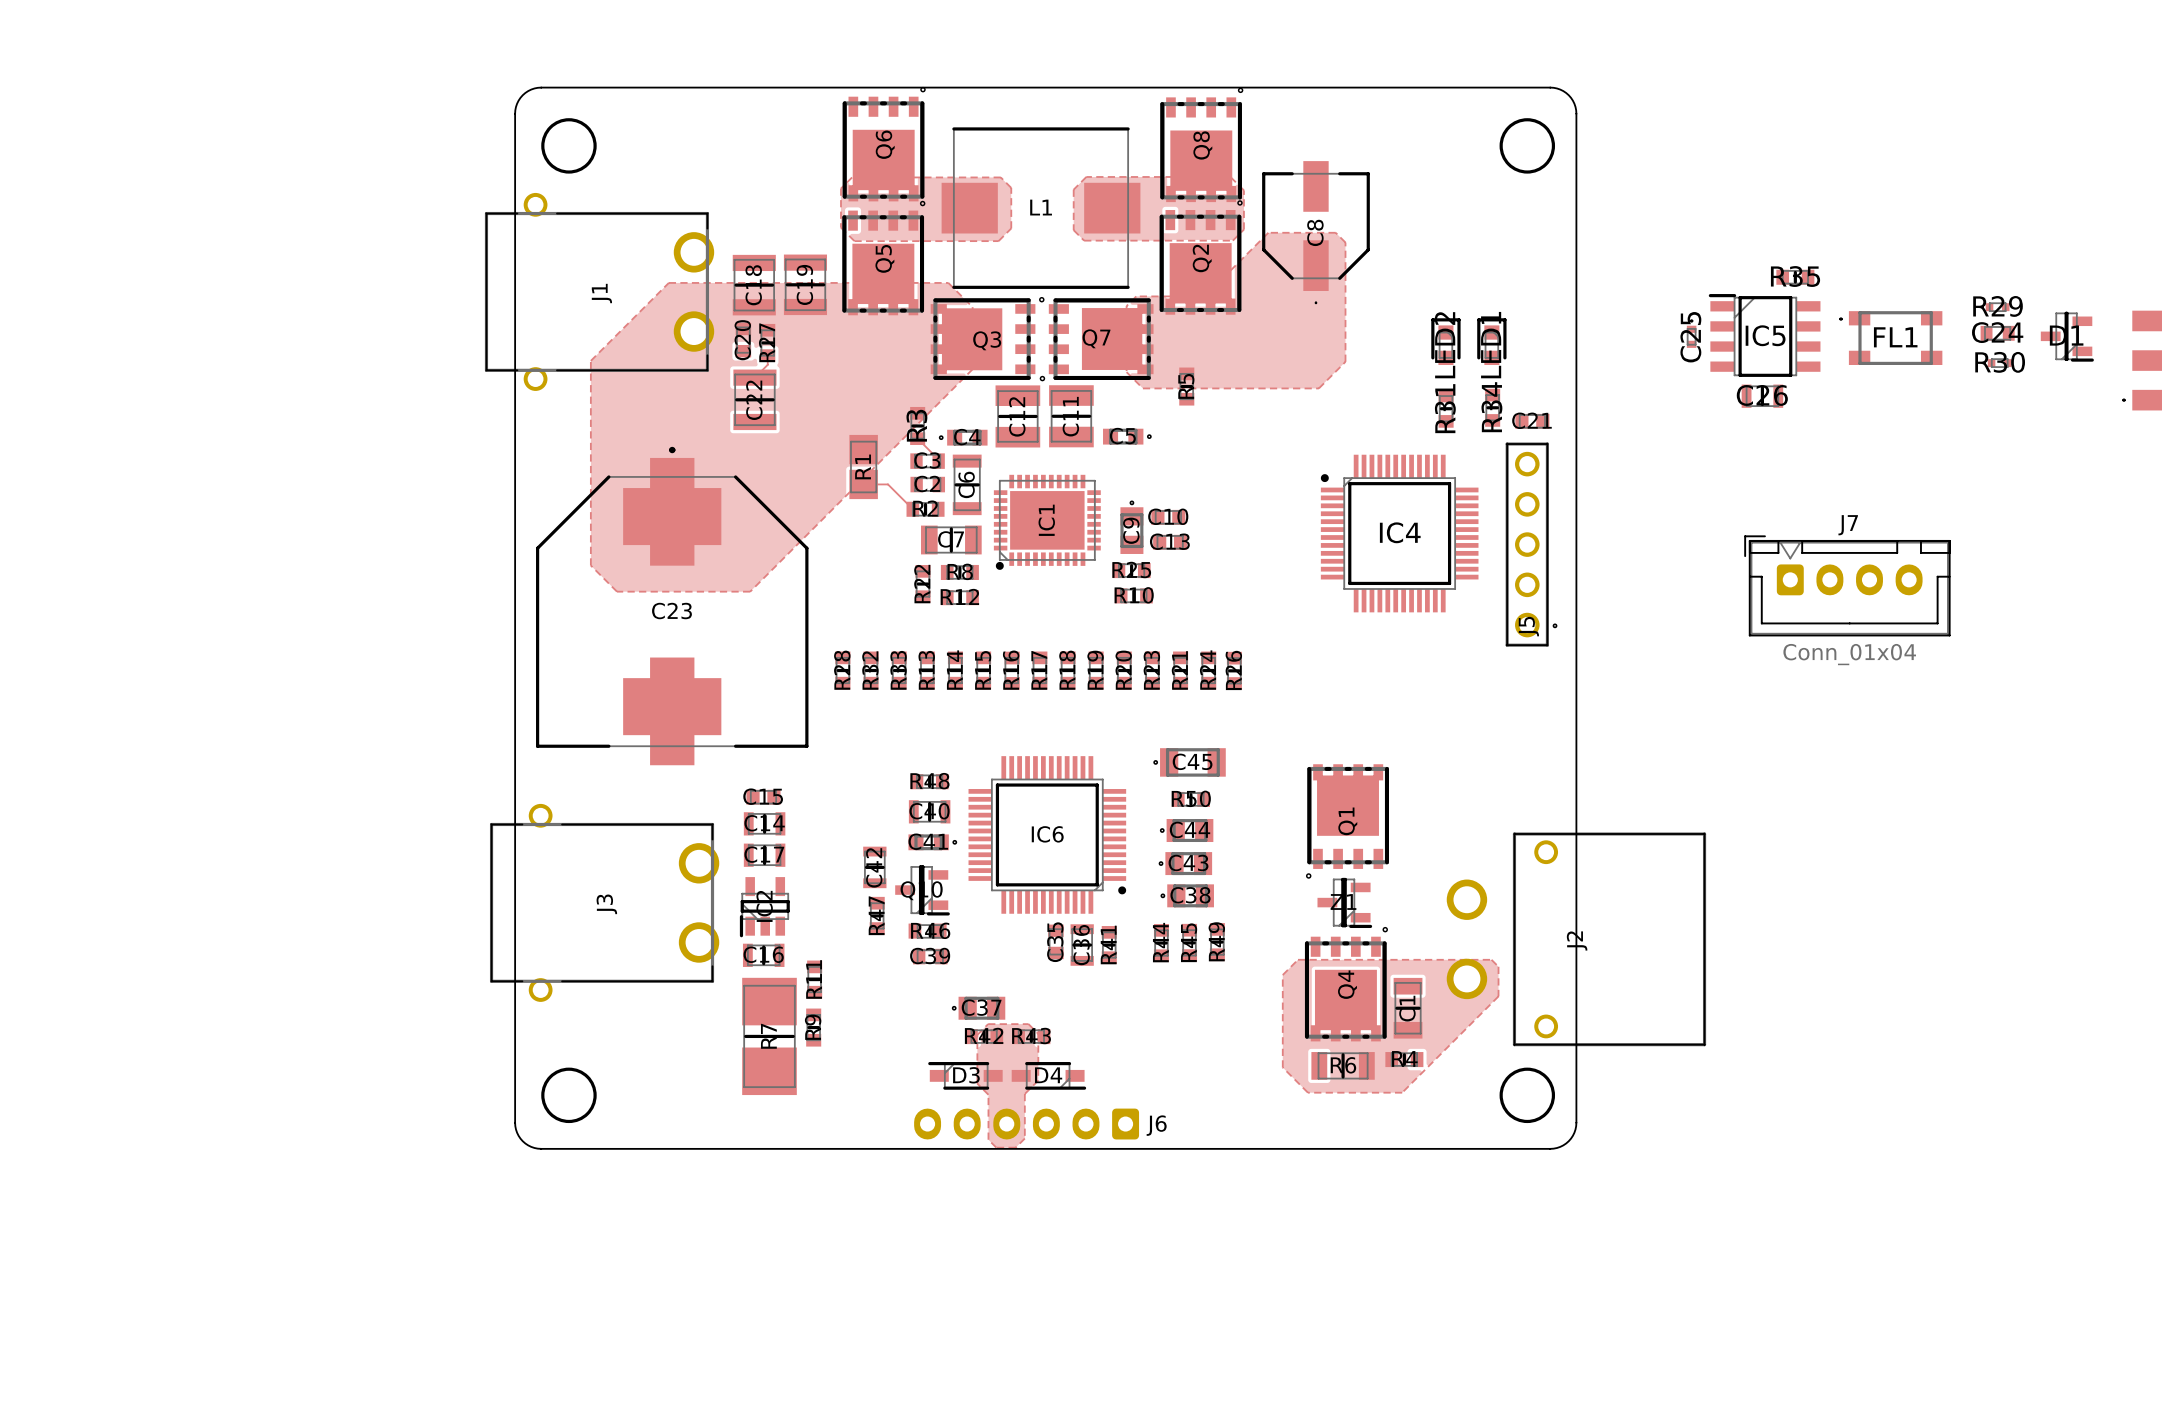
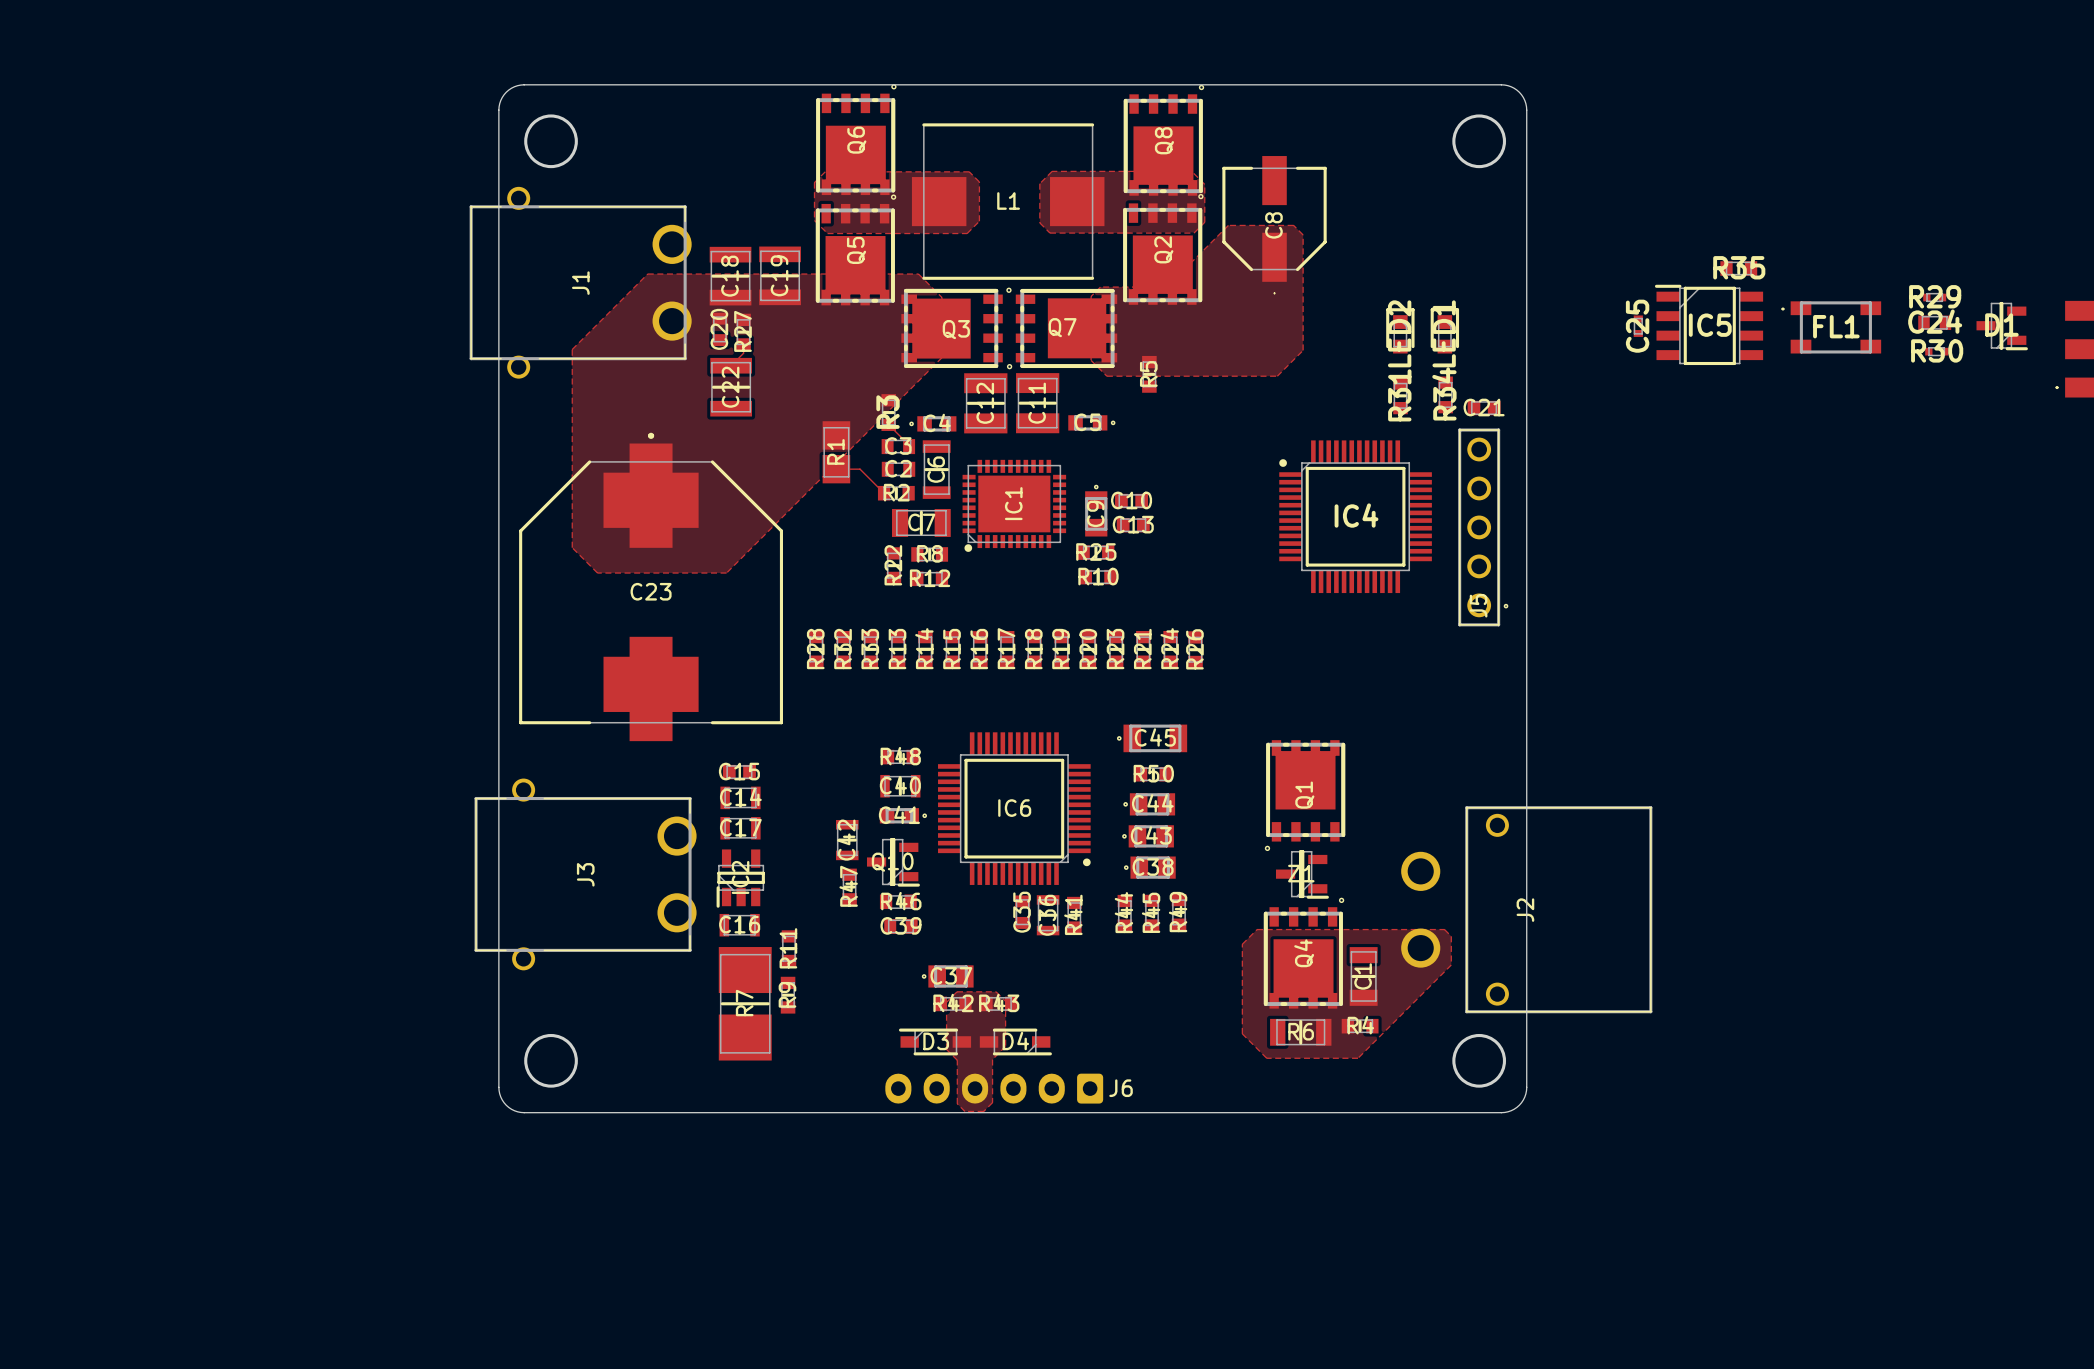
C26: (1762, 396) -> none
J7: Conn_01x04 (1847, 585) -> none

